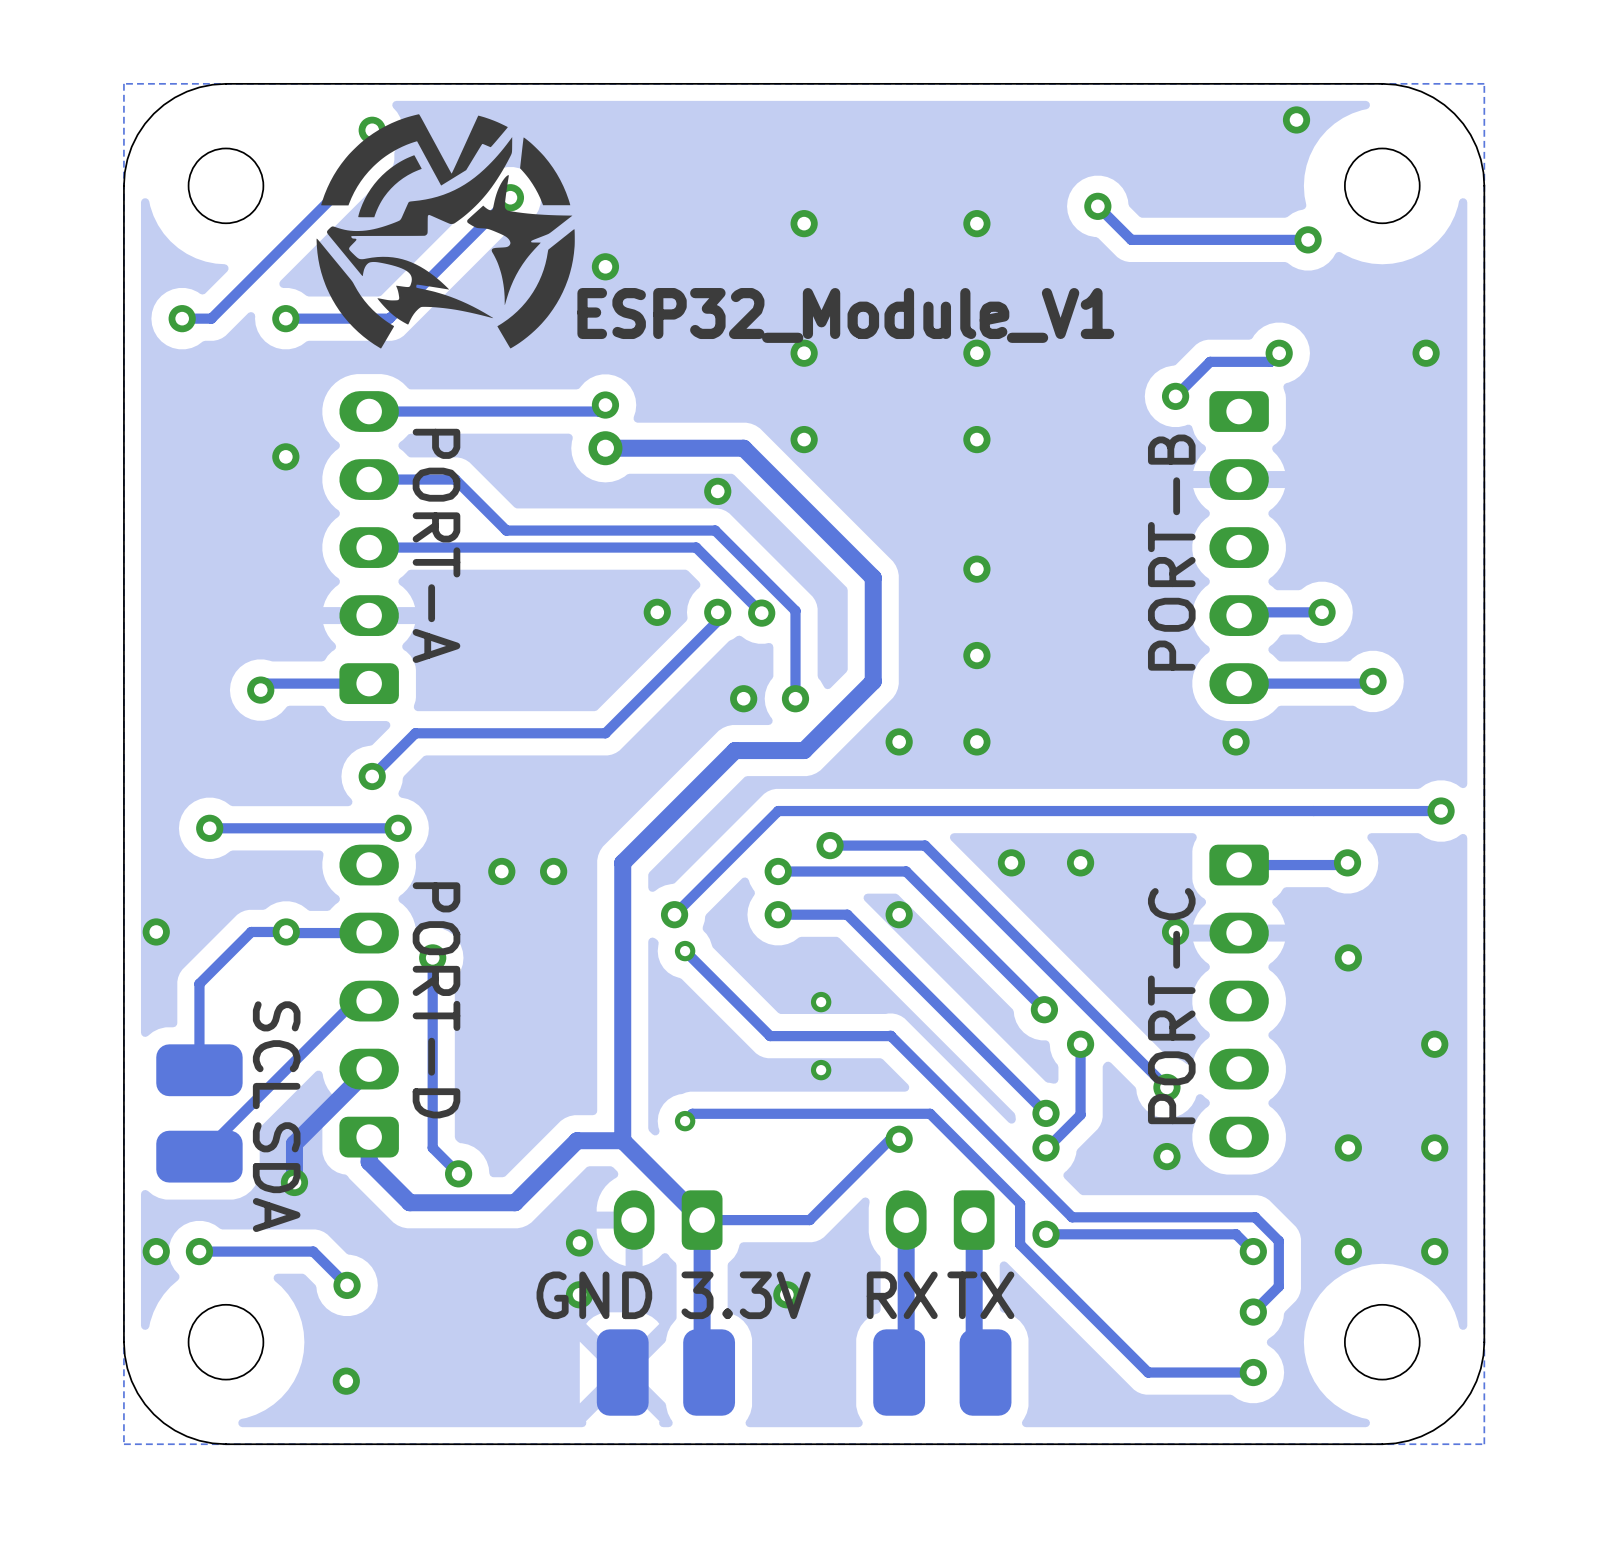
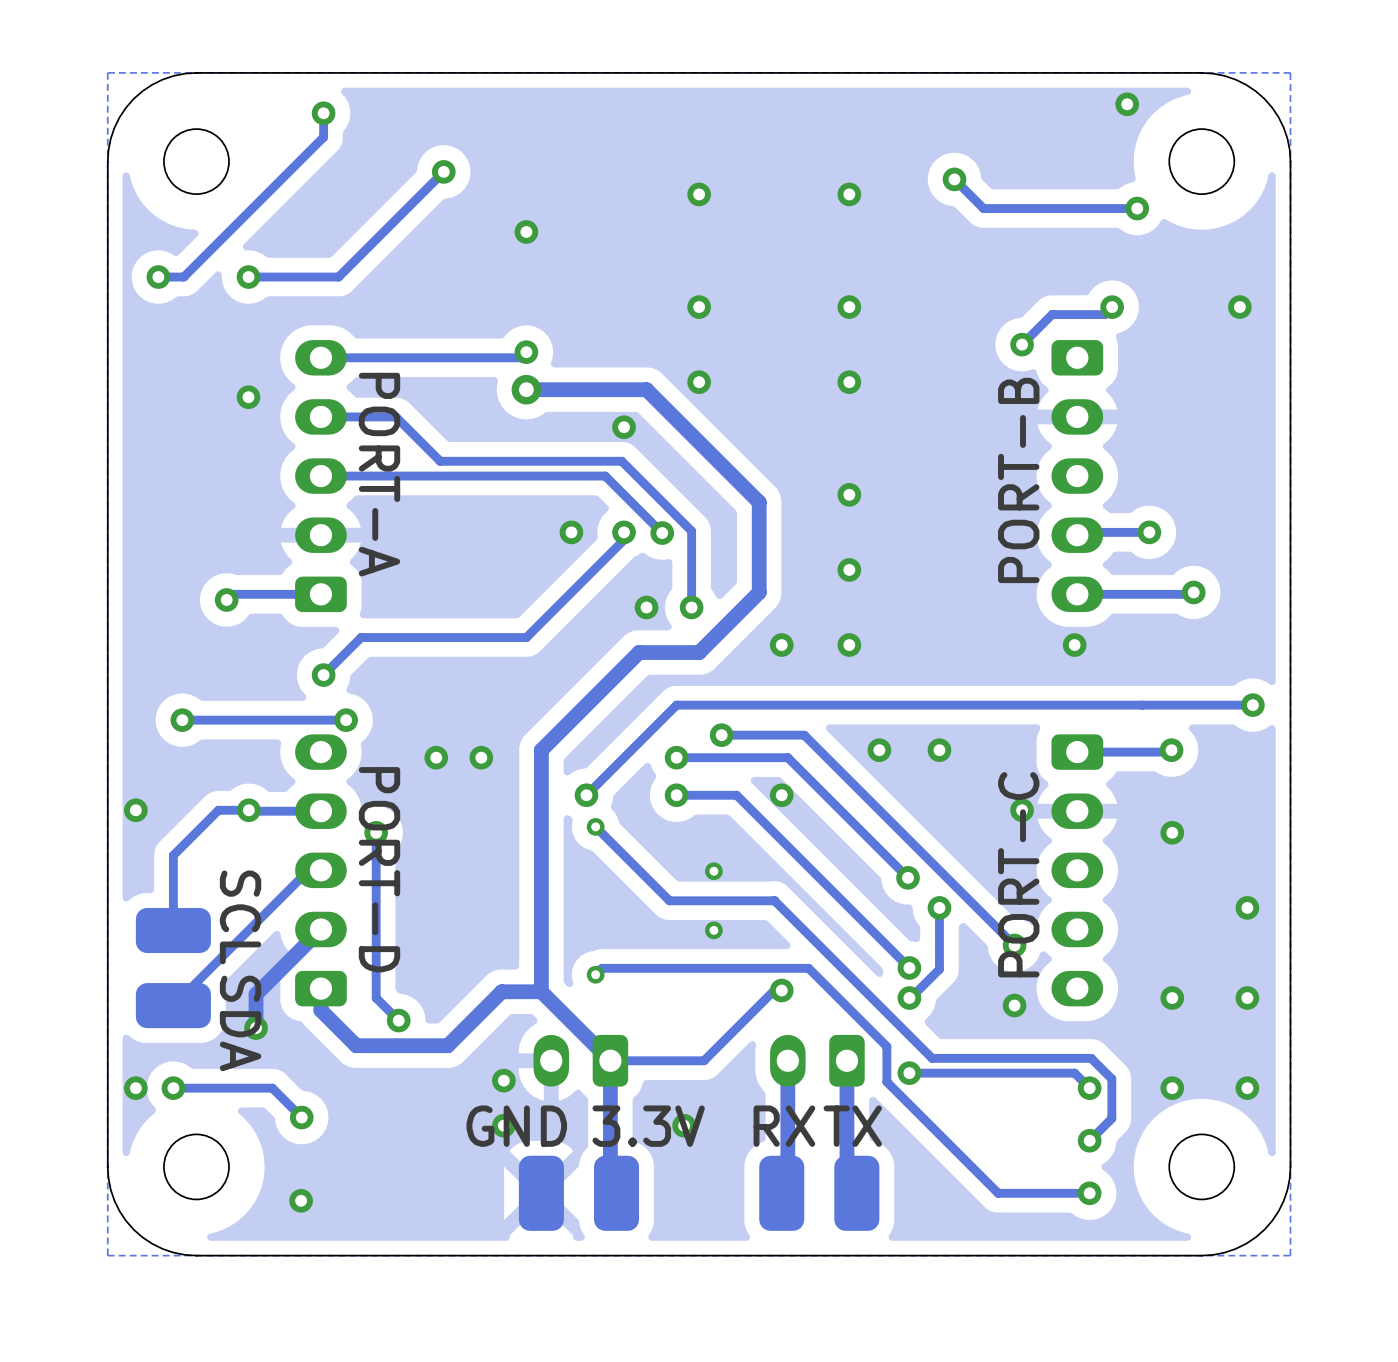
drawing: [316, 114, 575, 349] -> none
text: ESP32_Module_V1 (845, 315) -> none

